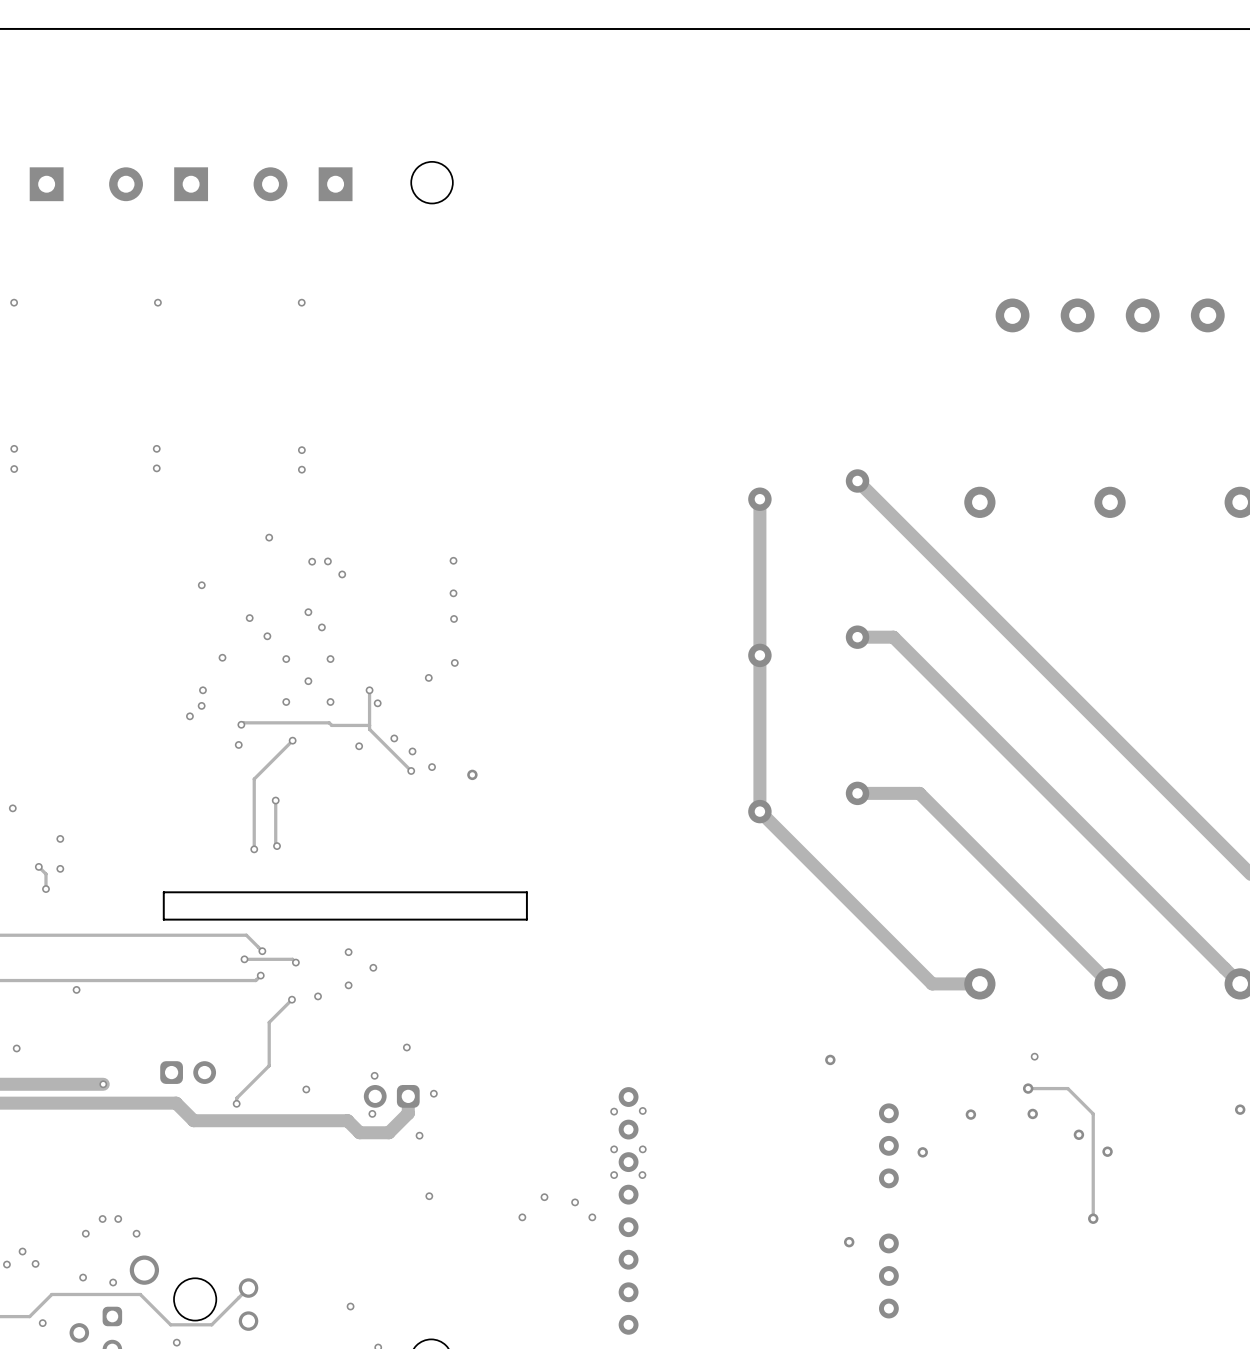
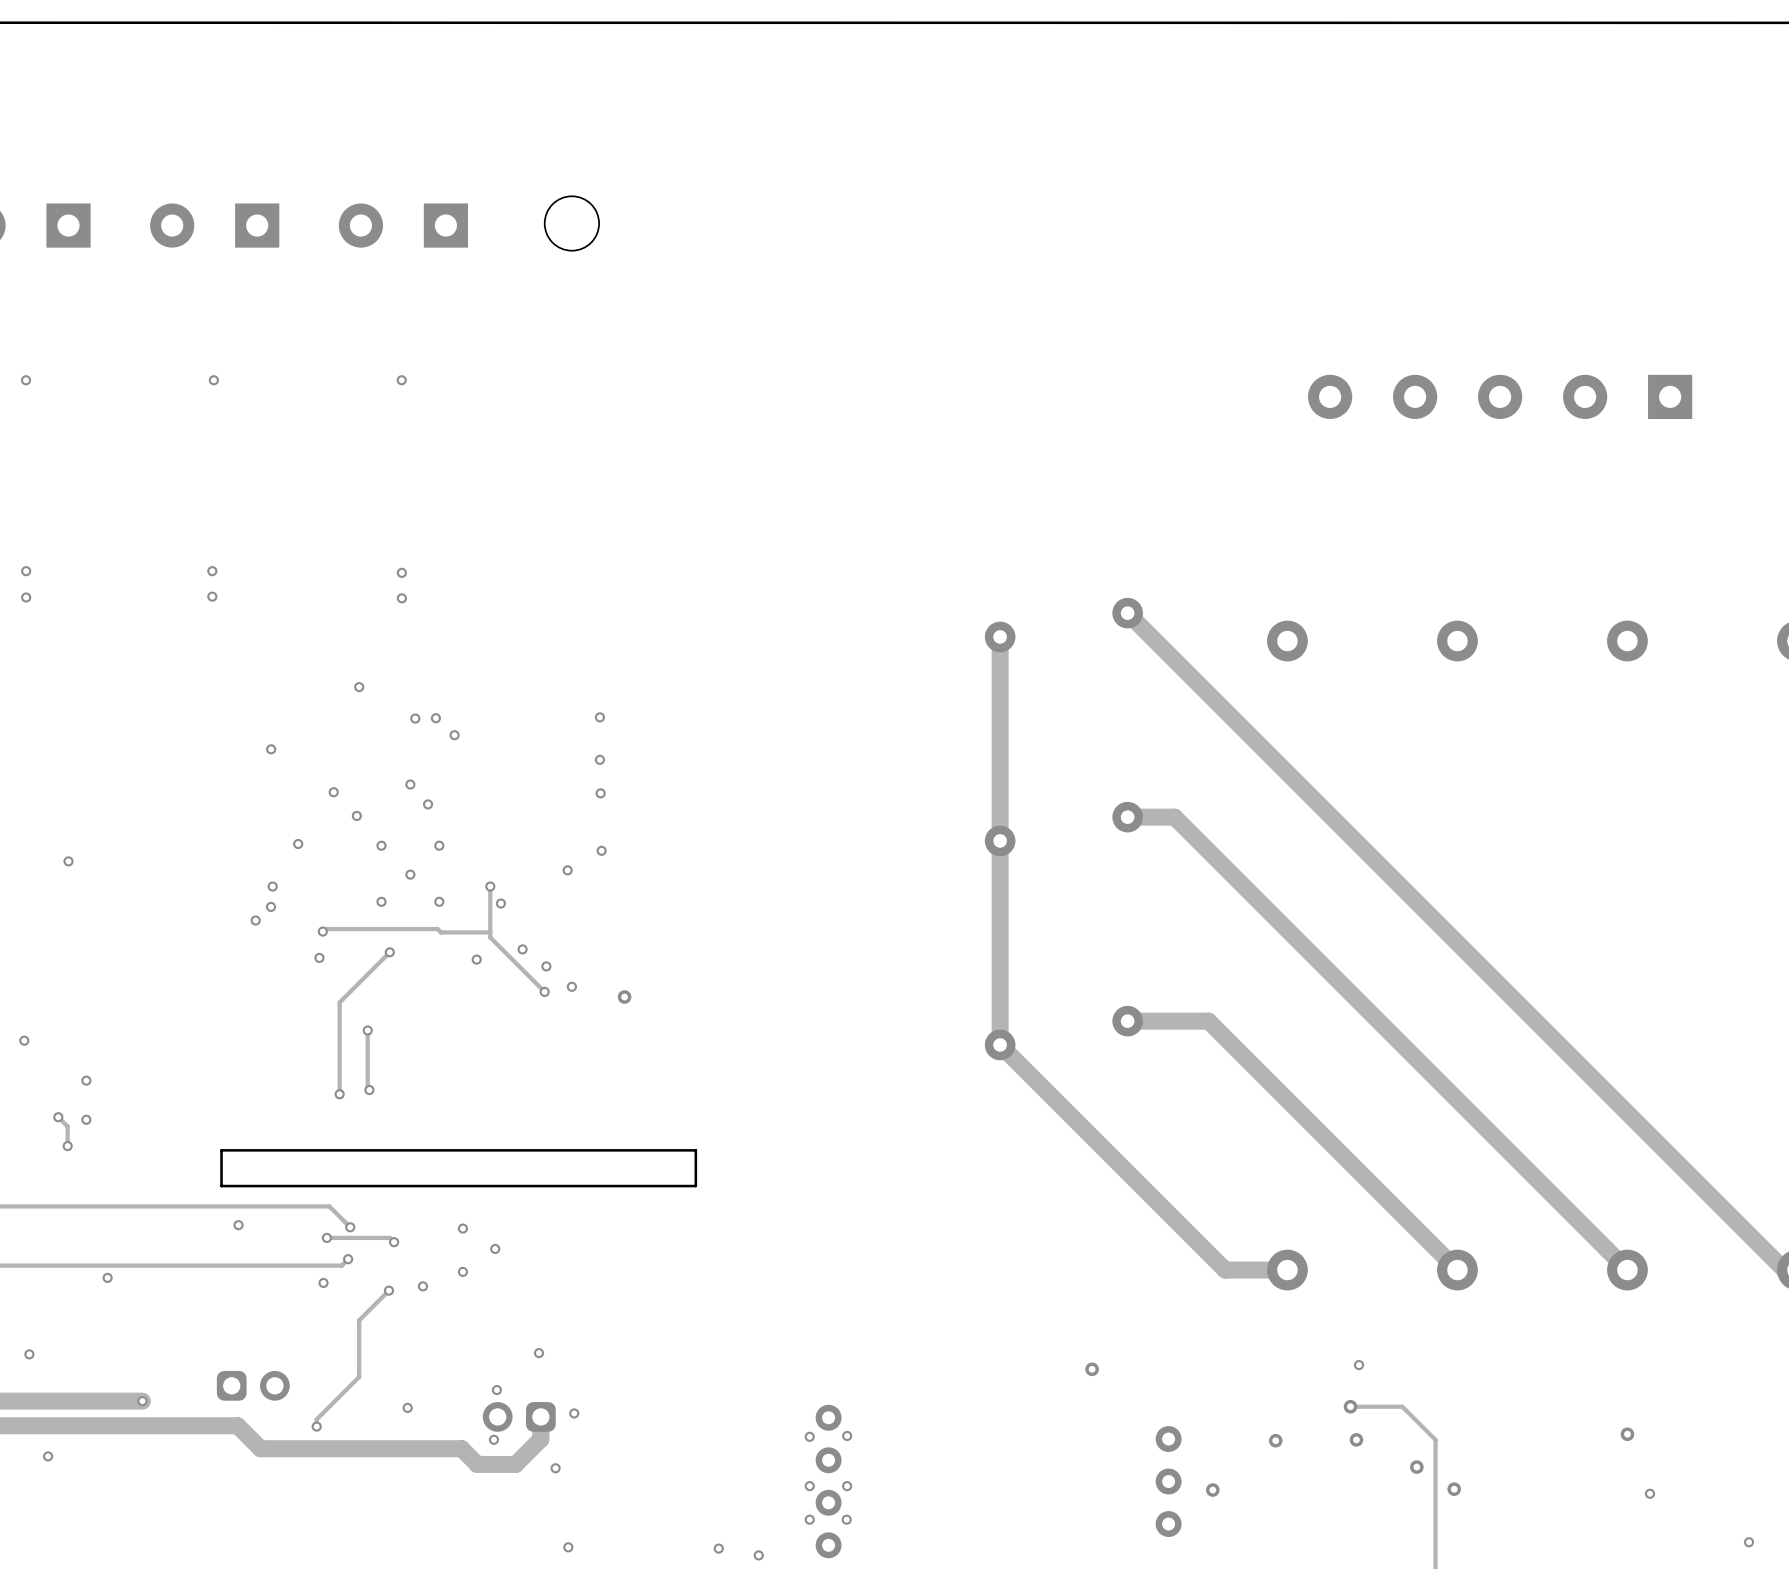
via: none -> (68, 861)
via: none -> (238, 1225)
via: none -> (323, 1282)
via: none -> (48, 1456)

